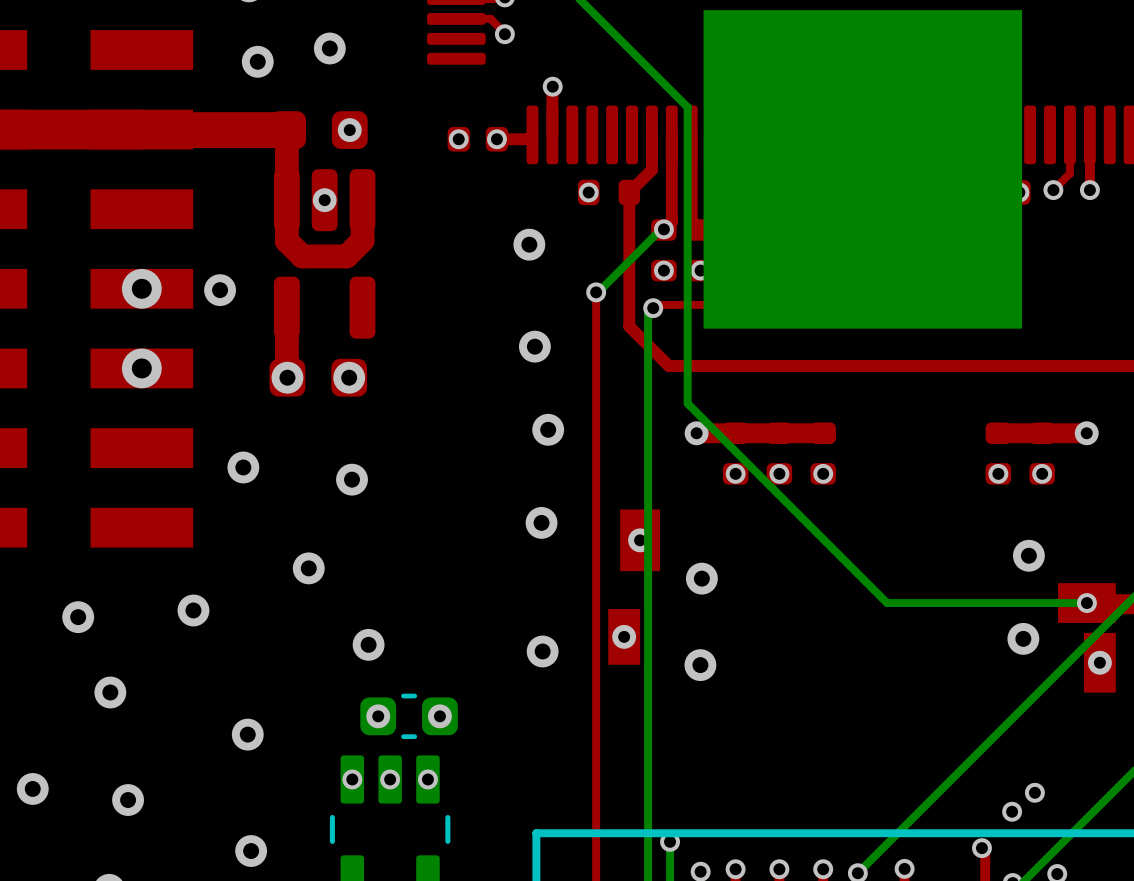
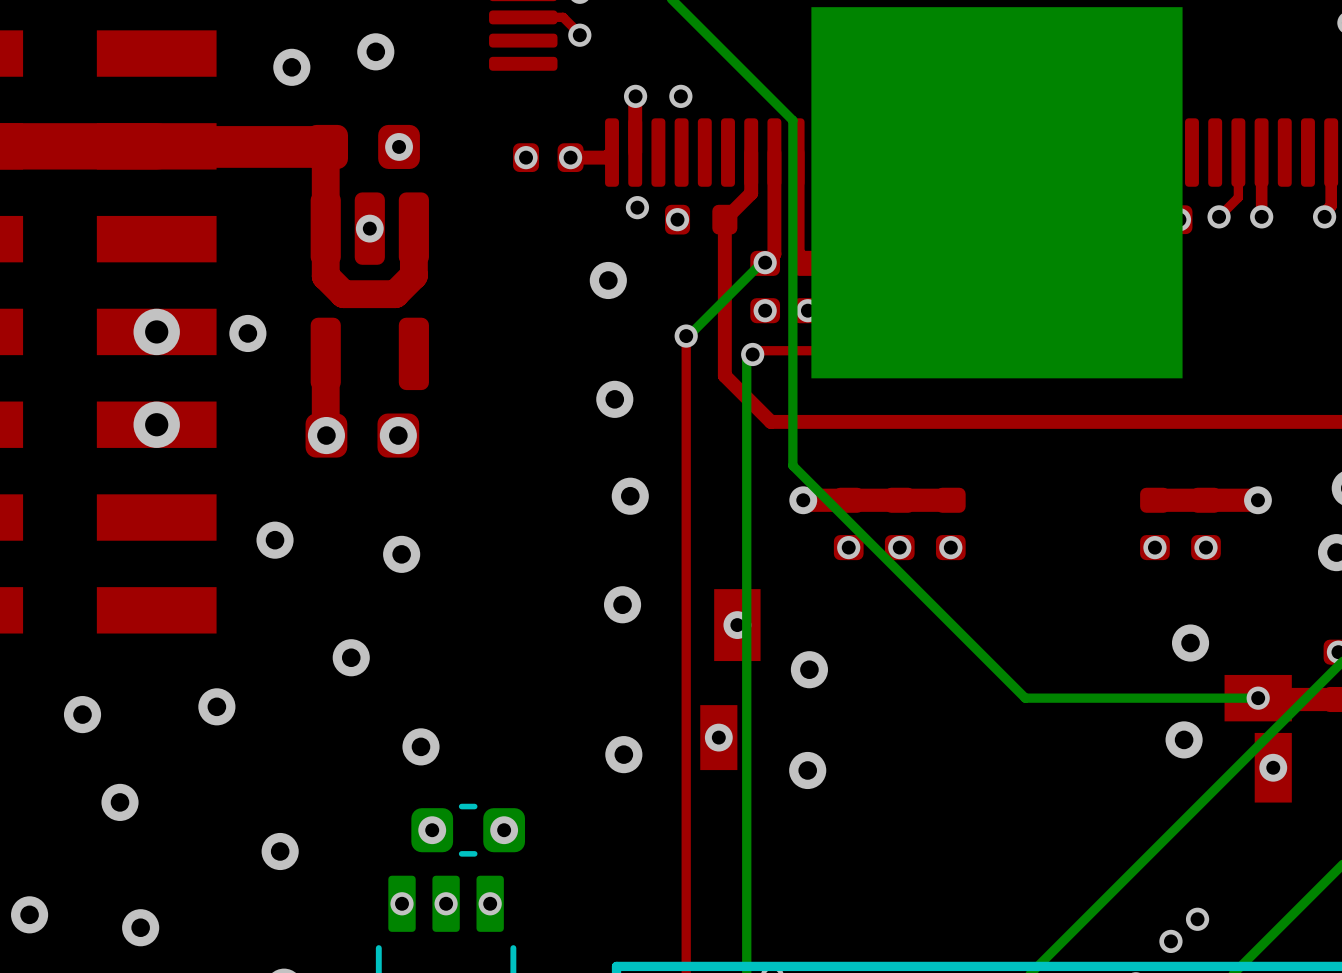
via: none -> (680, 96)
via: none -> (637, 207)

